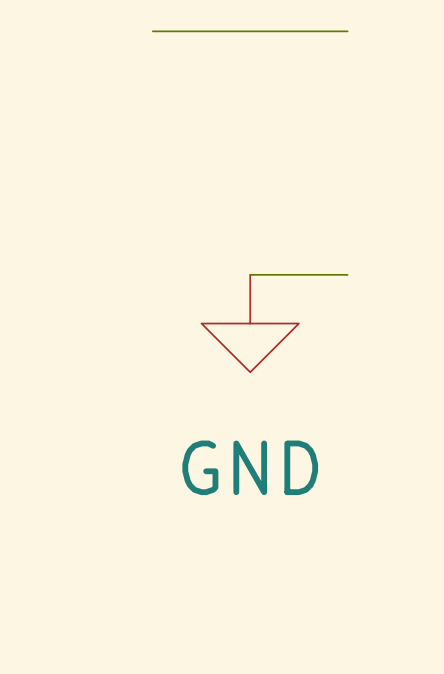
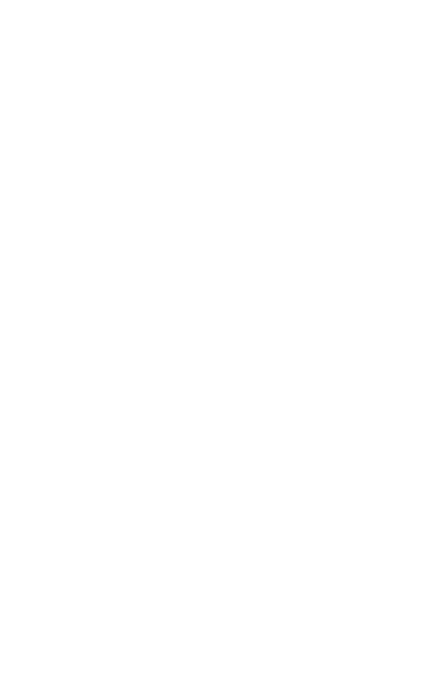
wire: (152, 31) (347, 31) -> none
wire: (250, 274) (347, 274) -> none
power symbol: GND (250, 323) -> none

